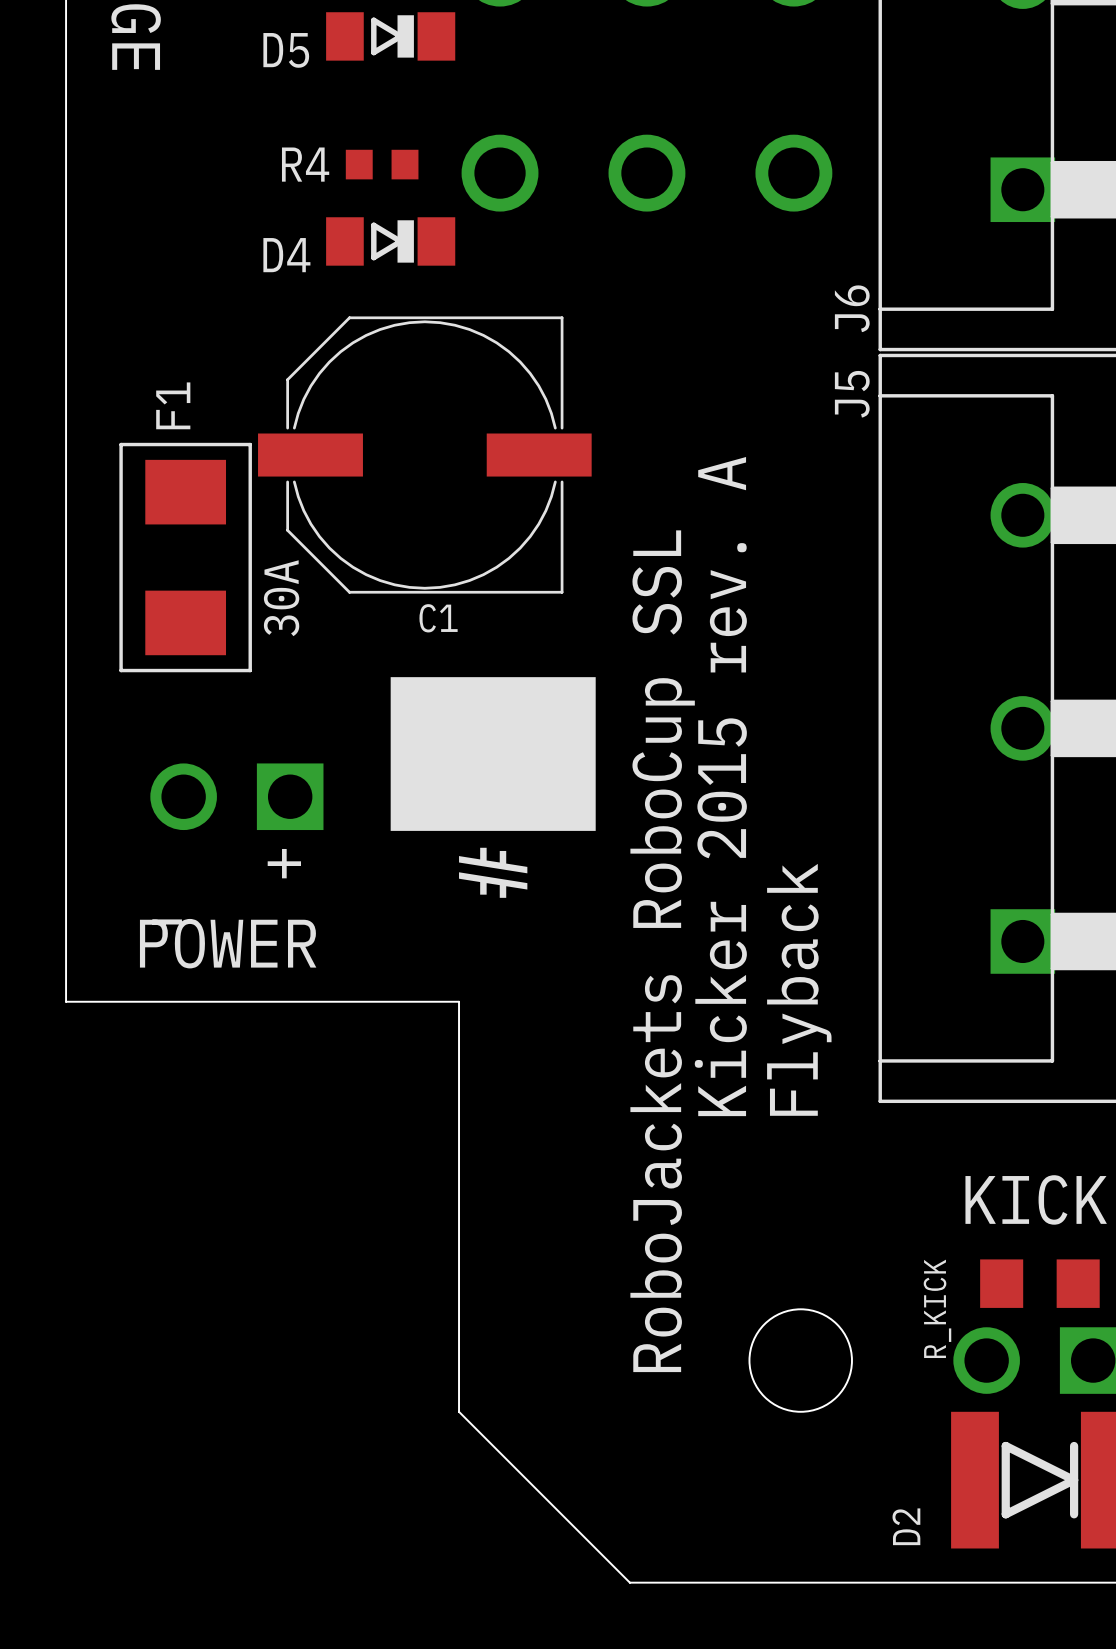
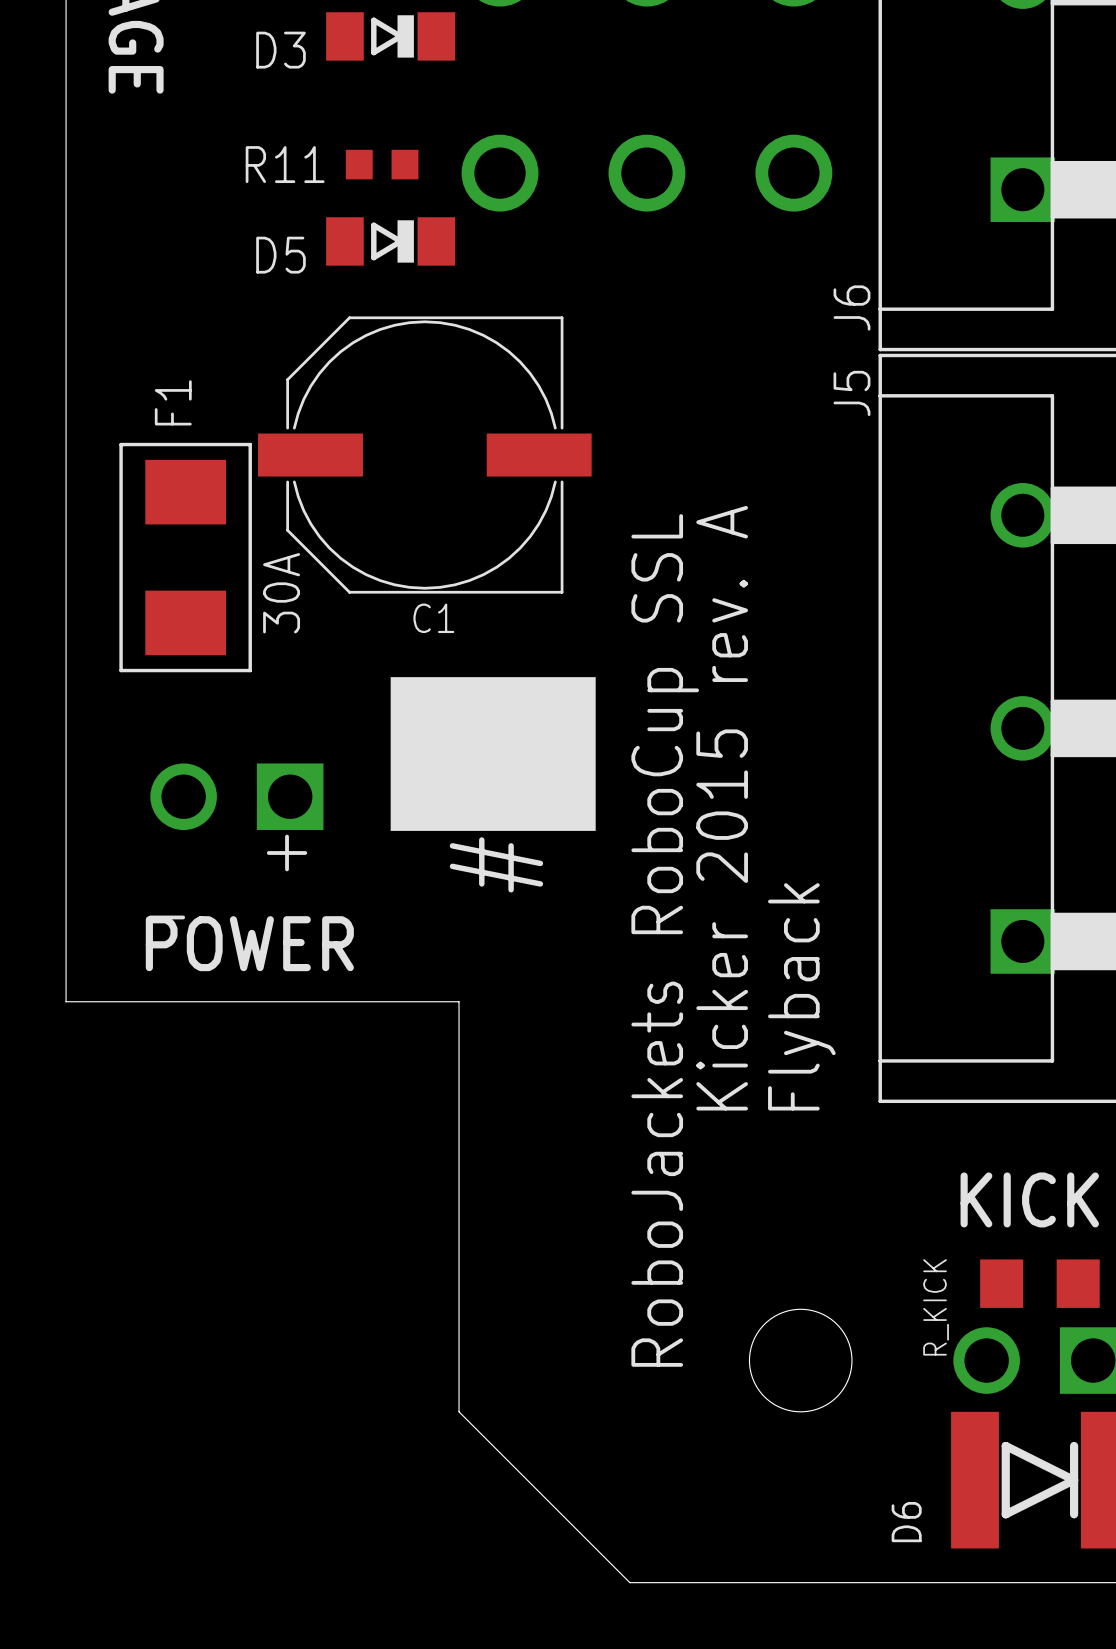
D5 name: D5 (286, 50) -> D3 (280, 50)
R4 name: R4 (305, 164) -> R11 (285, 164)
D4 name: D4 (286, 255) -> D5 (280, 255)
D2 name: D2 (906, 1526) -> D6 (906, 1522)

